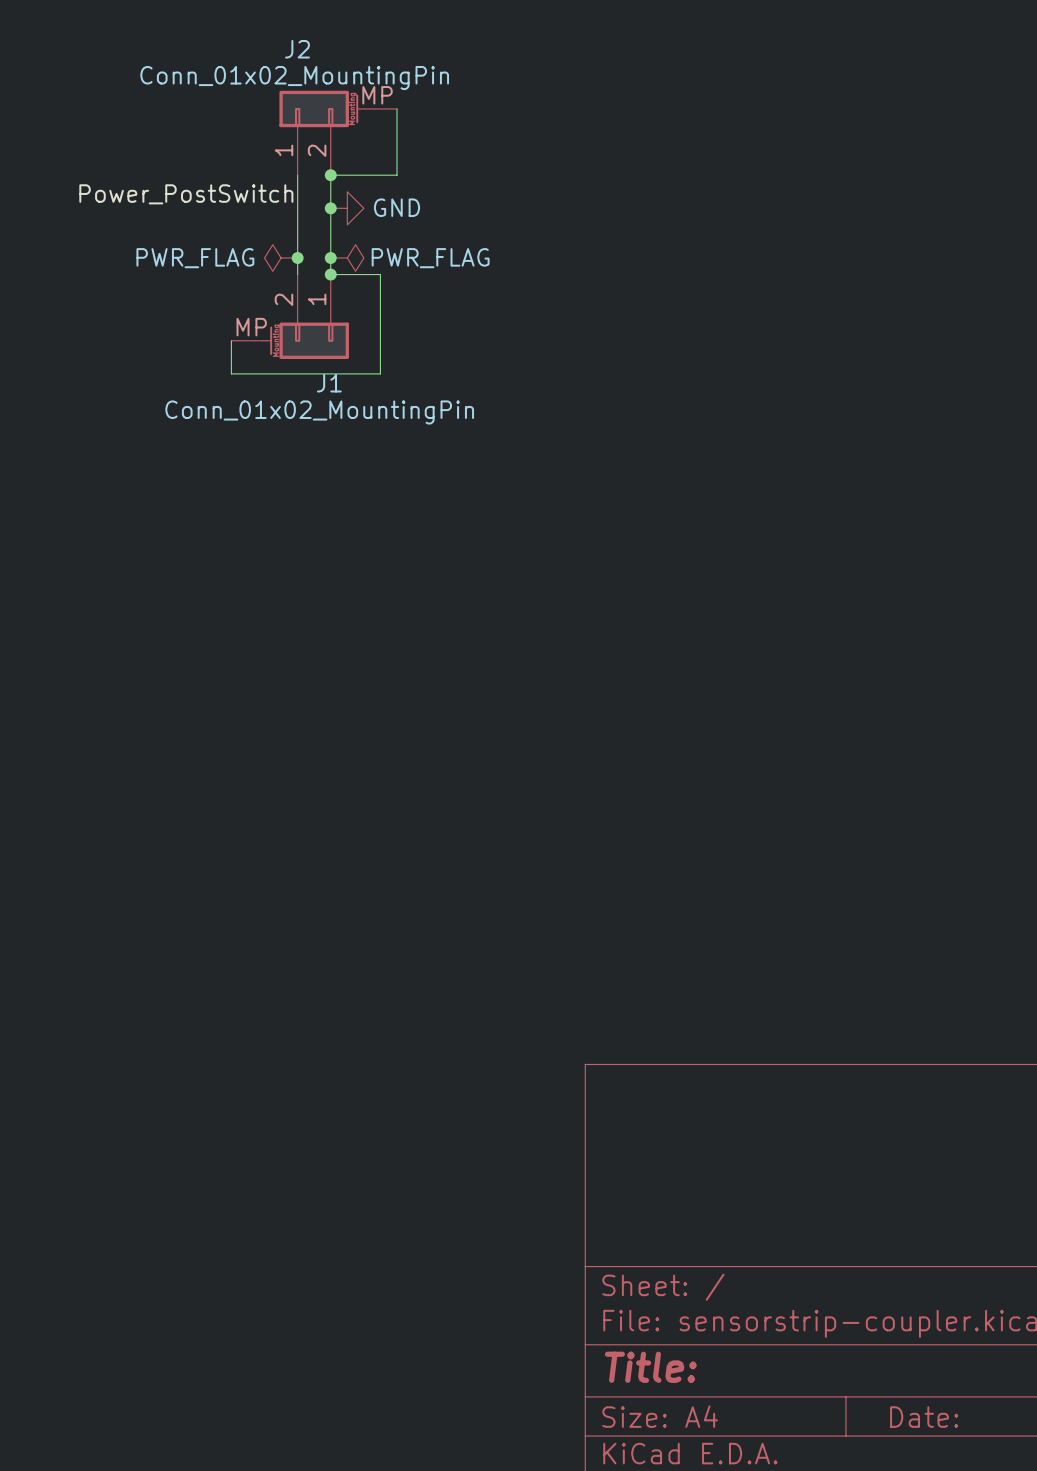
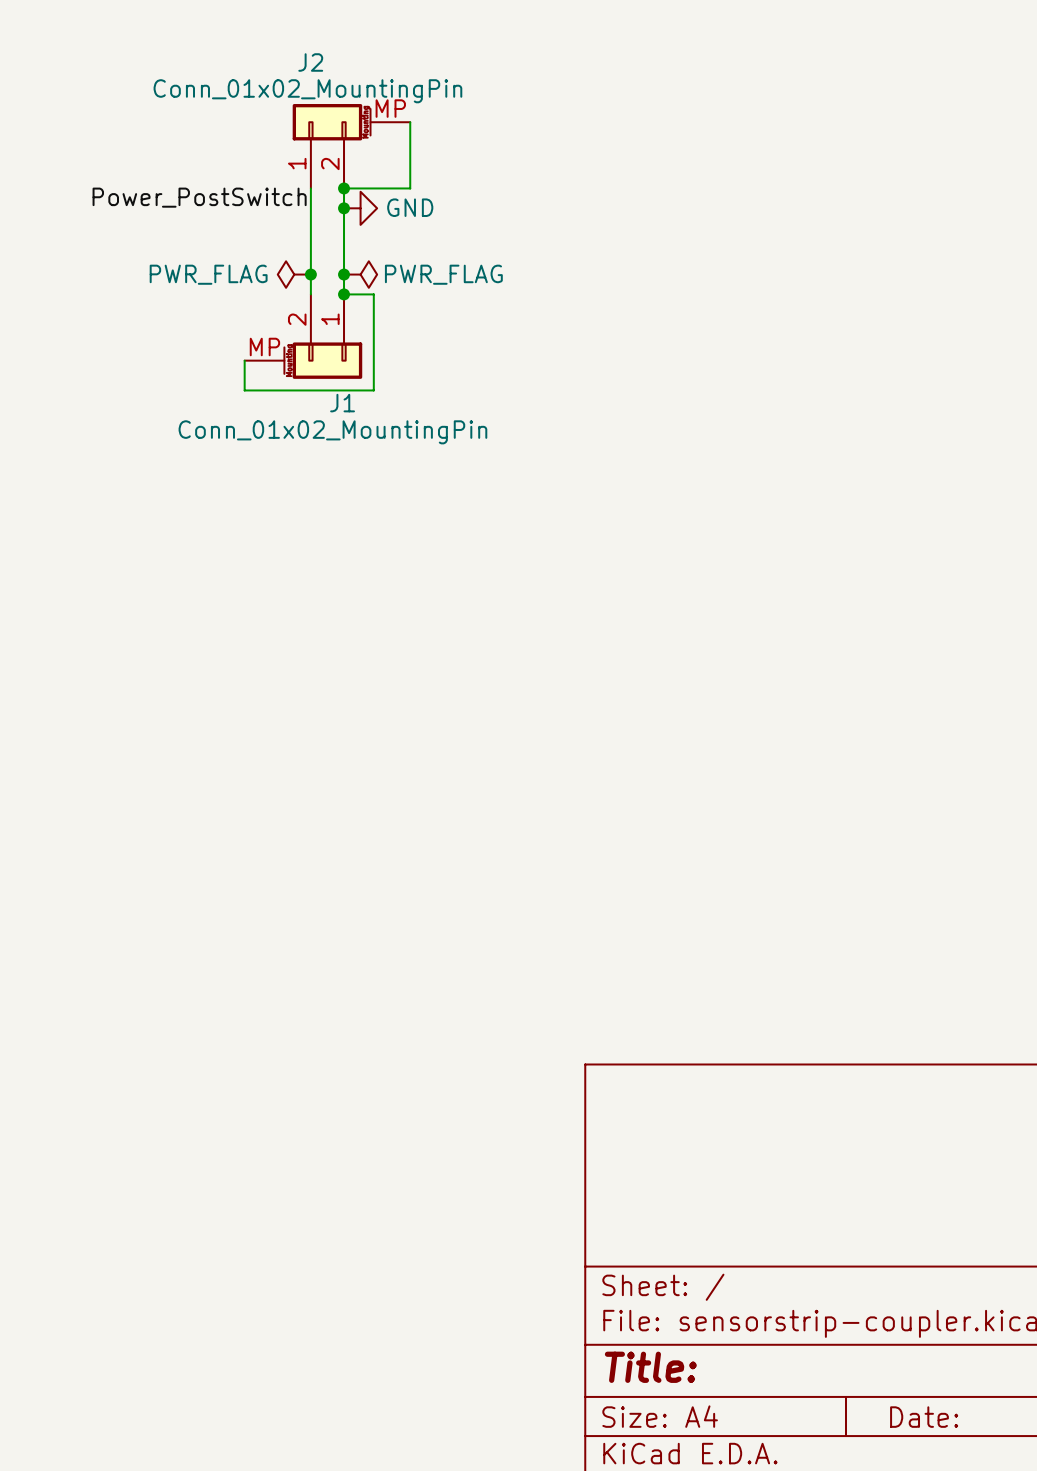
wire: (396, 108) (396, 175) (330, 175) (330, 274) (380, 274) (380, 373) (231, 373) (231, 340) -> none
wire: none -> (410, 122) (410, 188) (344, 188) (344, 294) (373, 294) (373, 390) (244, 390) (244, 360)
J2 position: (338, 132) -> (351, 146)
wire: (297, 175) (297, 274) -> none
junction: (330, 175) -> none
wire: none -> (310, 188) (310, 294)
junction: none -> (344, 188)
label position: Power_PostSwitch (186, 194) -> Power_PostSwitch (199, 197)
junction: (330, 208) -> none
junction: none -> (344, 208)
power symbol position: GND (347, 208) -> GND (360, 208)
power symbol position: PWR_FLAG (281, 257) -> PWR_FLAG (294, 274)
junction: (297, 257) -> none
junction: (330, 257) -> none
power symbol position: PWR_FLAG (347, 257) -> PWR_FLAG (360, 274)
junction: none -> (310, 274)
junction: (330, 274) -> none
junction: none -> (344, 274)
junction: none -> (344, 294)
J1 position: (290, 316) -> (303, 336)

